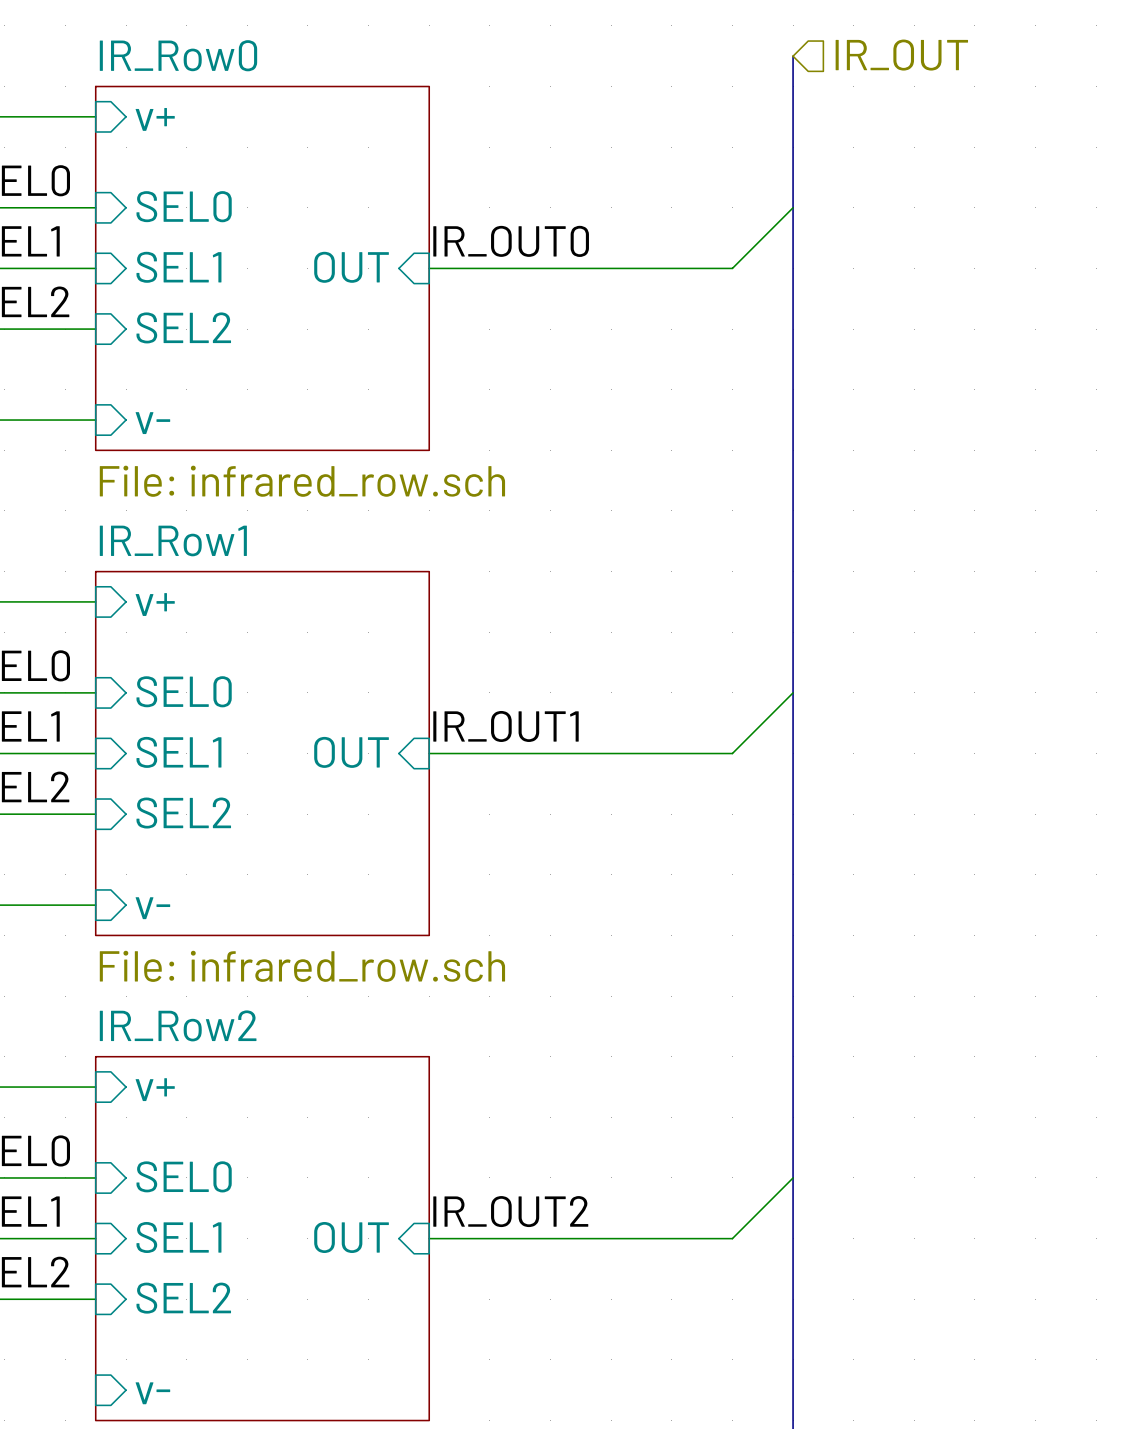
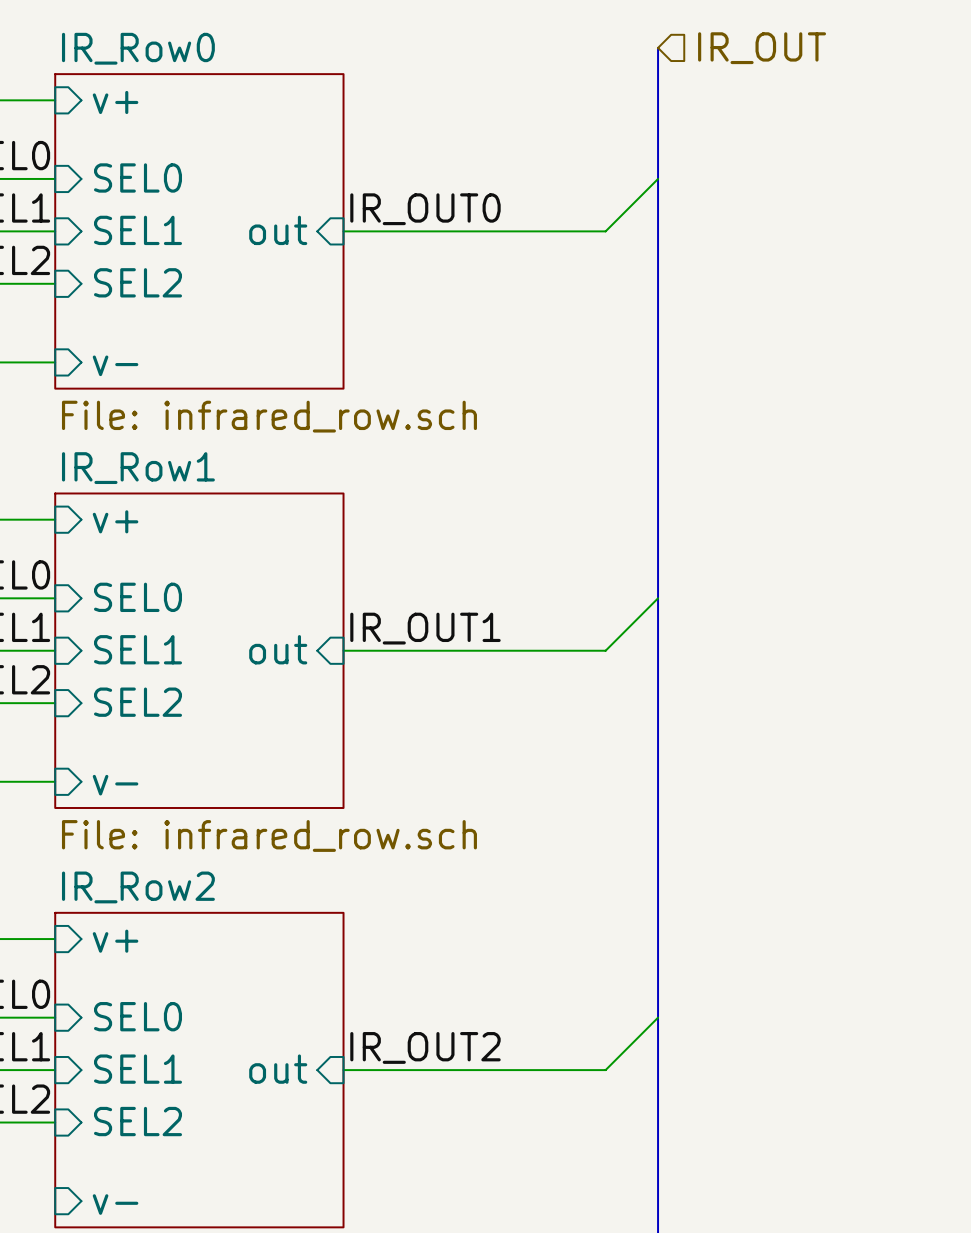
sheet pin: OUT (351, 267) -> out (278, 230)
sheet pin: OUT (351, 752) -> out (278, 649)
sheet pin: OUT (351, 1237) -> out (278, 1069)

